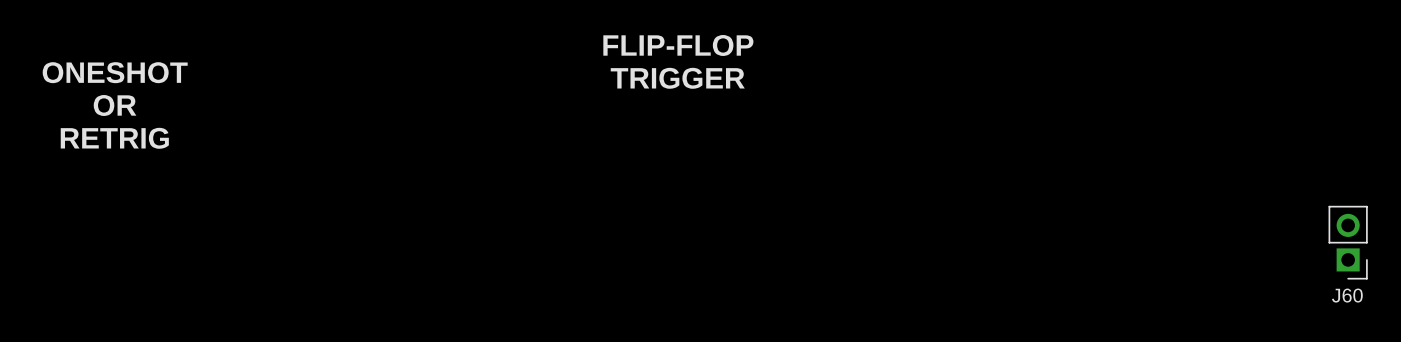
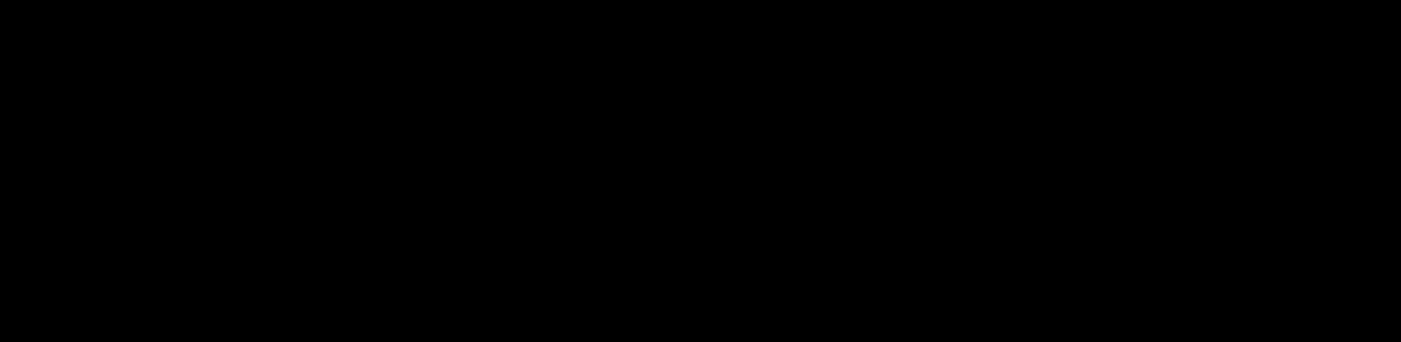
text: FLIP-FLOP (678, 45) -> none
text: ONESHOT (115, 72) -> none
text: TRIGGER (677, 78) -> none
text: OR (115, 105) -> none
text: RETRIG (114, 138) -> none
J60: (1348, 242) -> none

